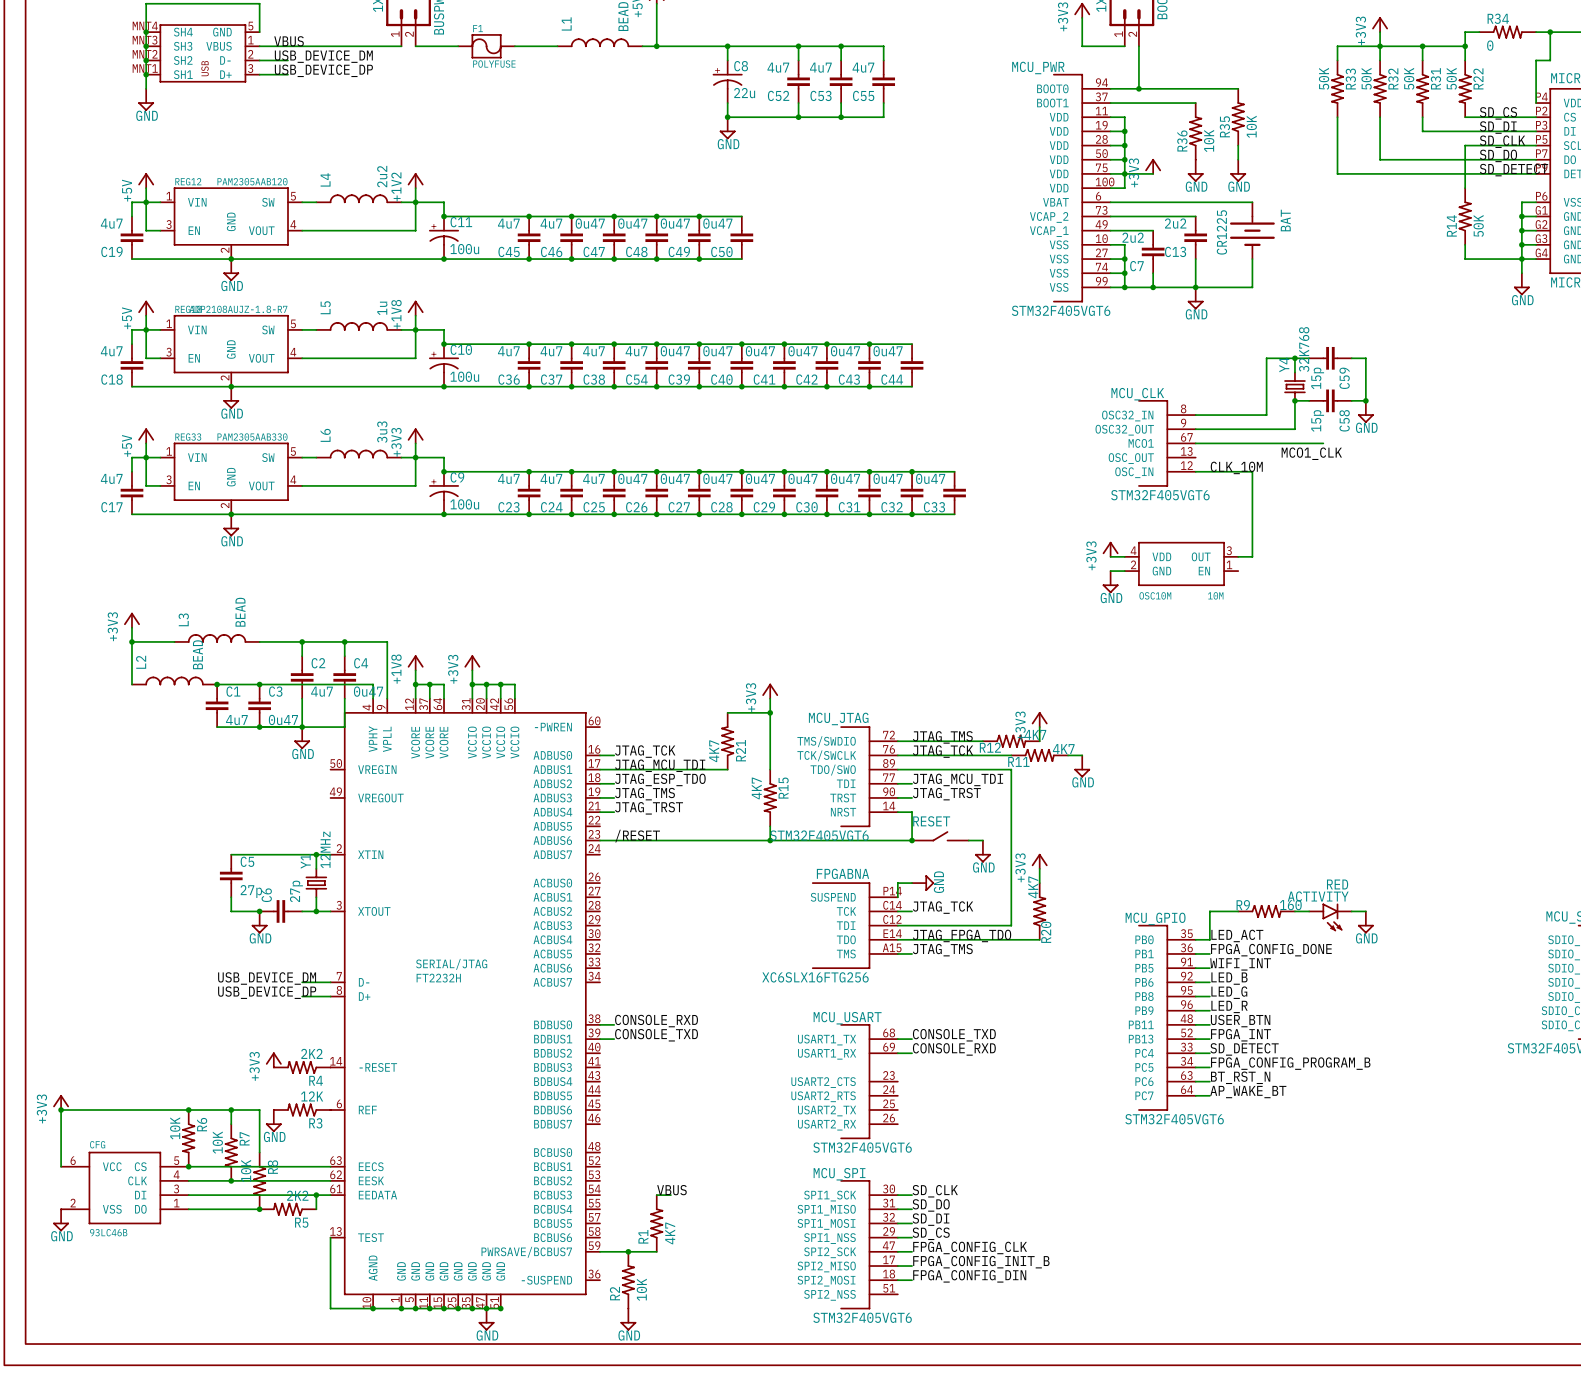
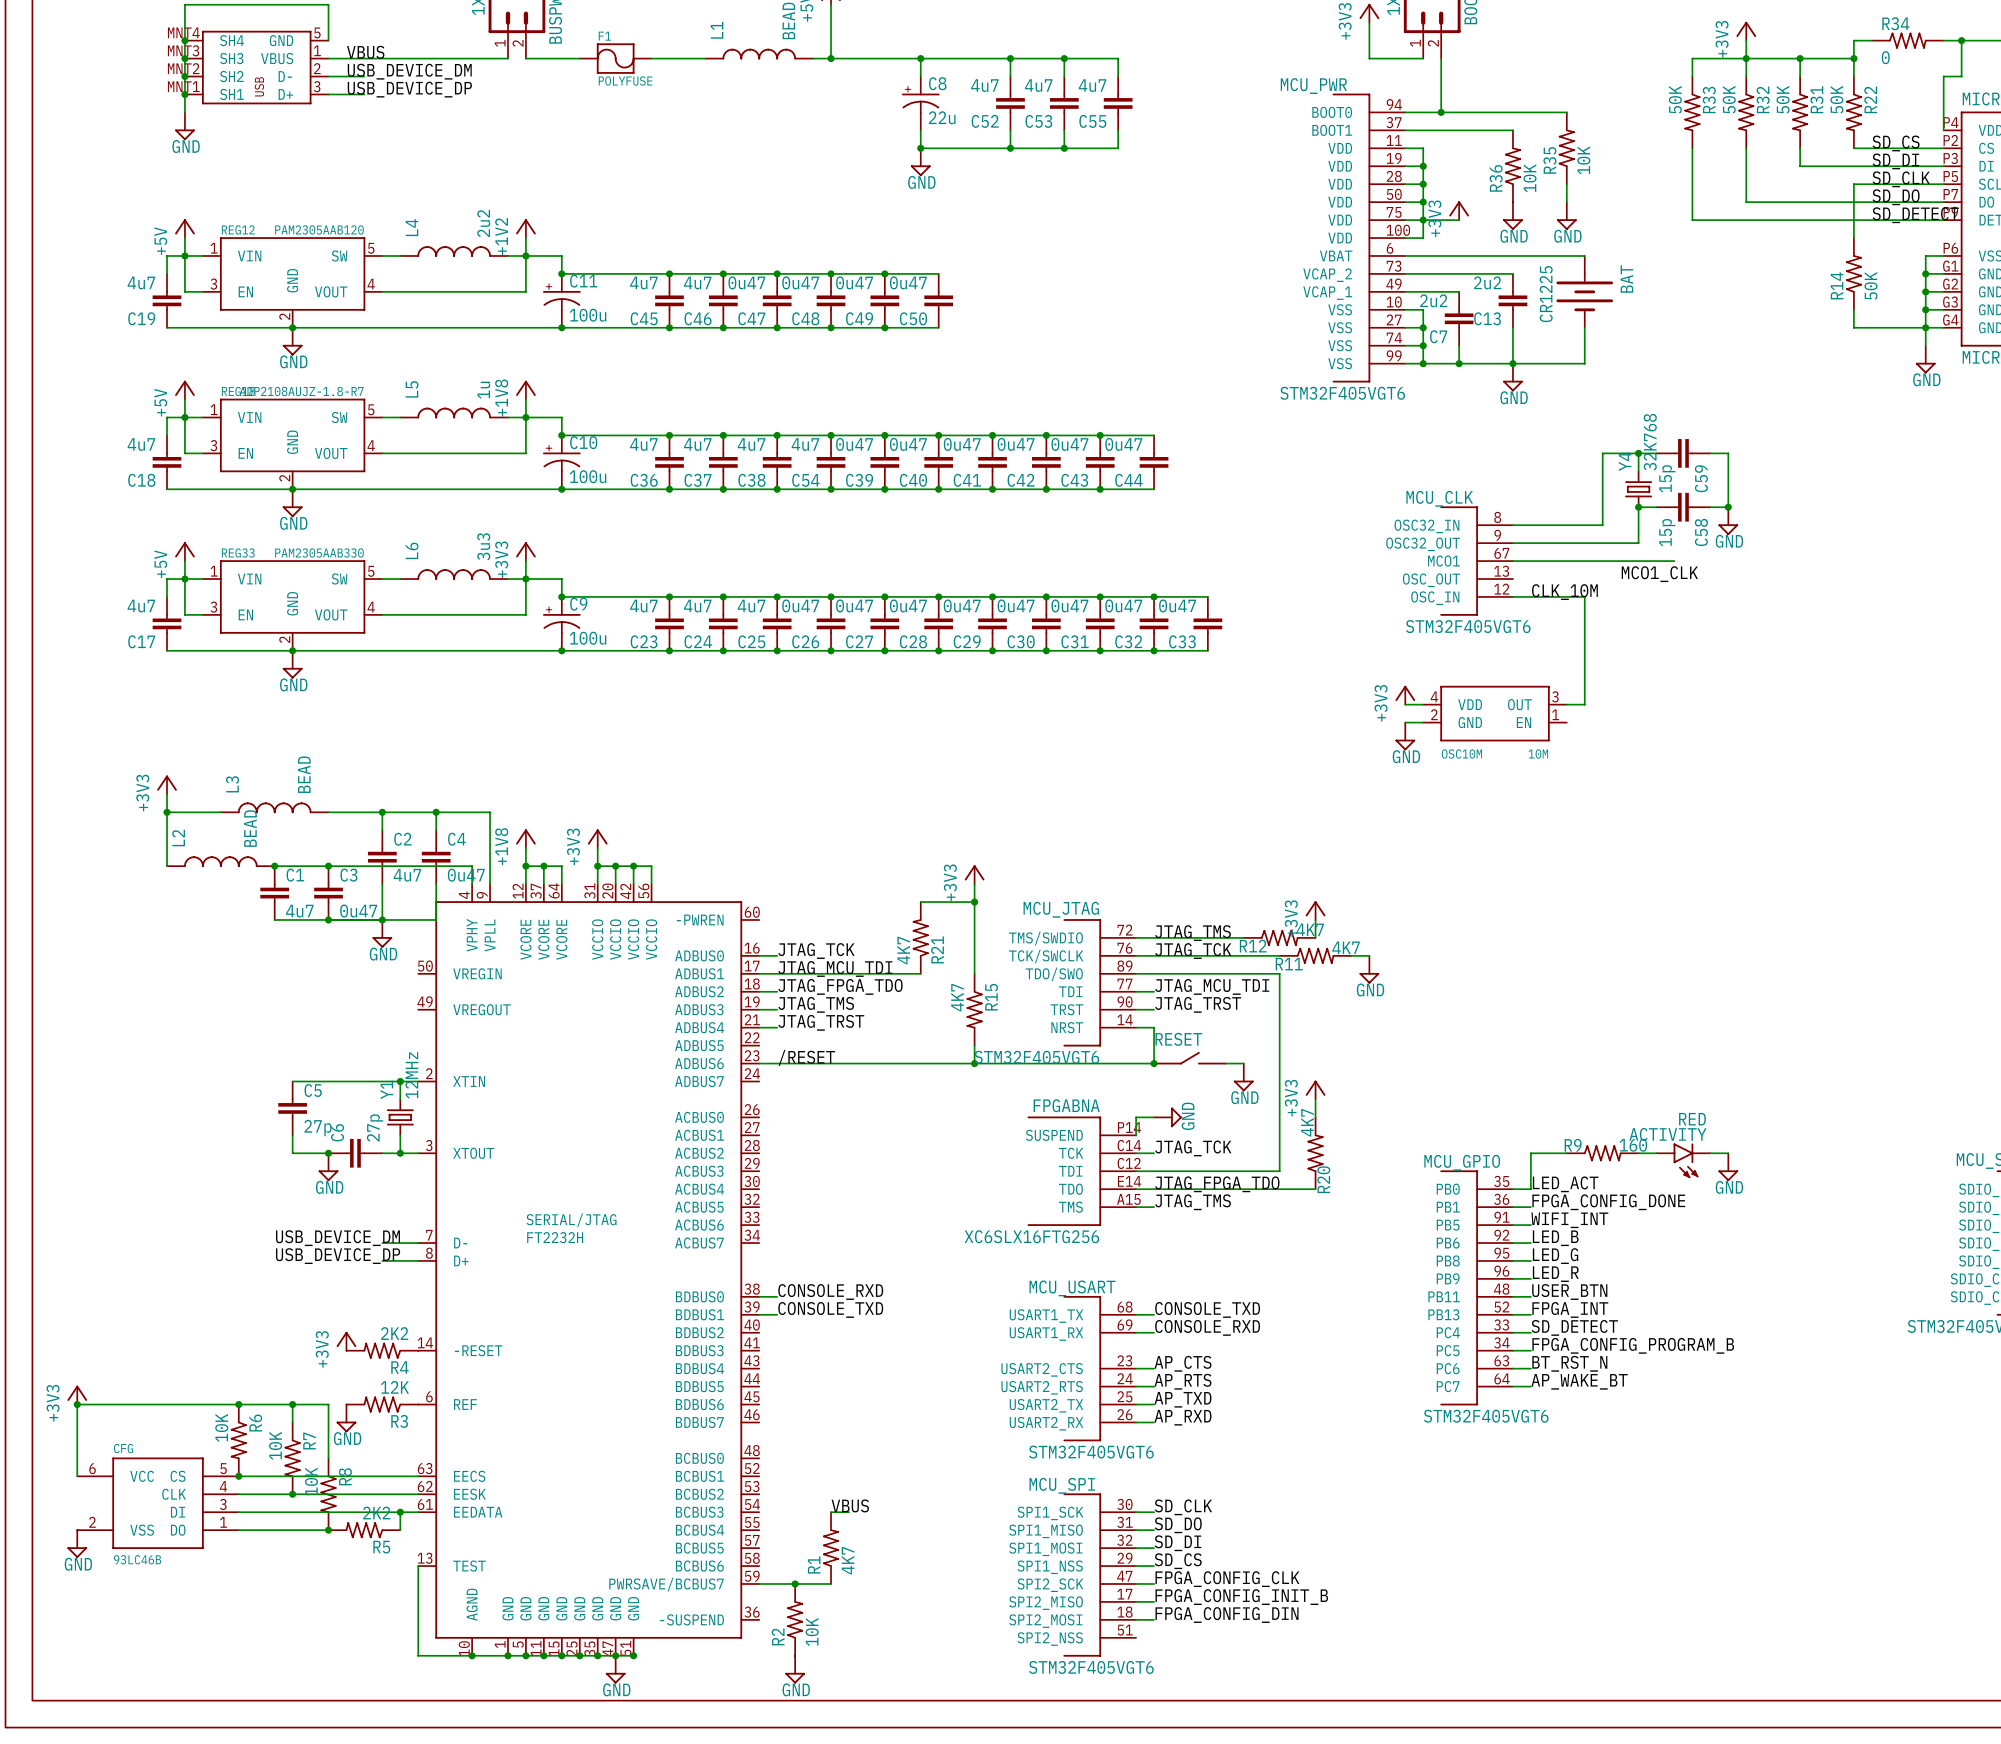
label: JTAG_ESP_TDO (660, 779) -> JTAG_FPGA_TDO (840, 986)
label: none -> AP_CTS (1182, 1363)
wire: none -> (1136, 1368) (1154, 1368)
label: none -> AP_RTS (1182, 1381)
wire: none -> (1136, 1386) (1154, 1386)
label: none -> AP_TXD (1183, 1399)
wire: none -> (1136, 1404) (1154, 1404)
label: none -> AP_RXD (1183, 1417)
wire: none -> (1136, 1422) (1154, 1422)

